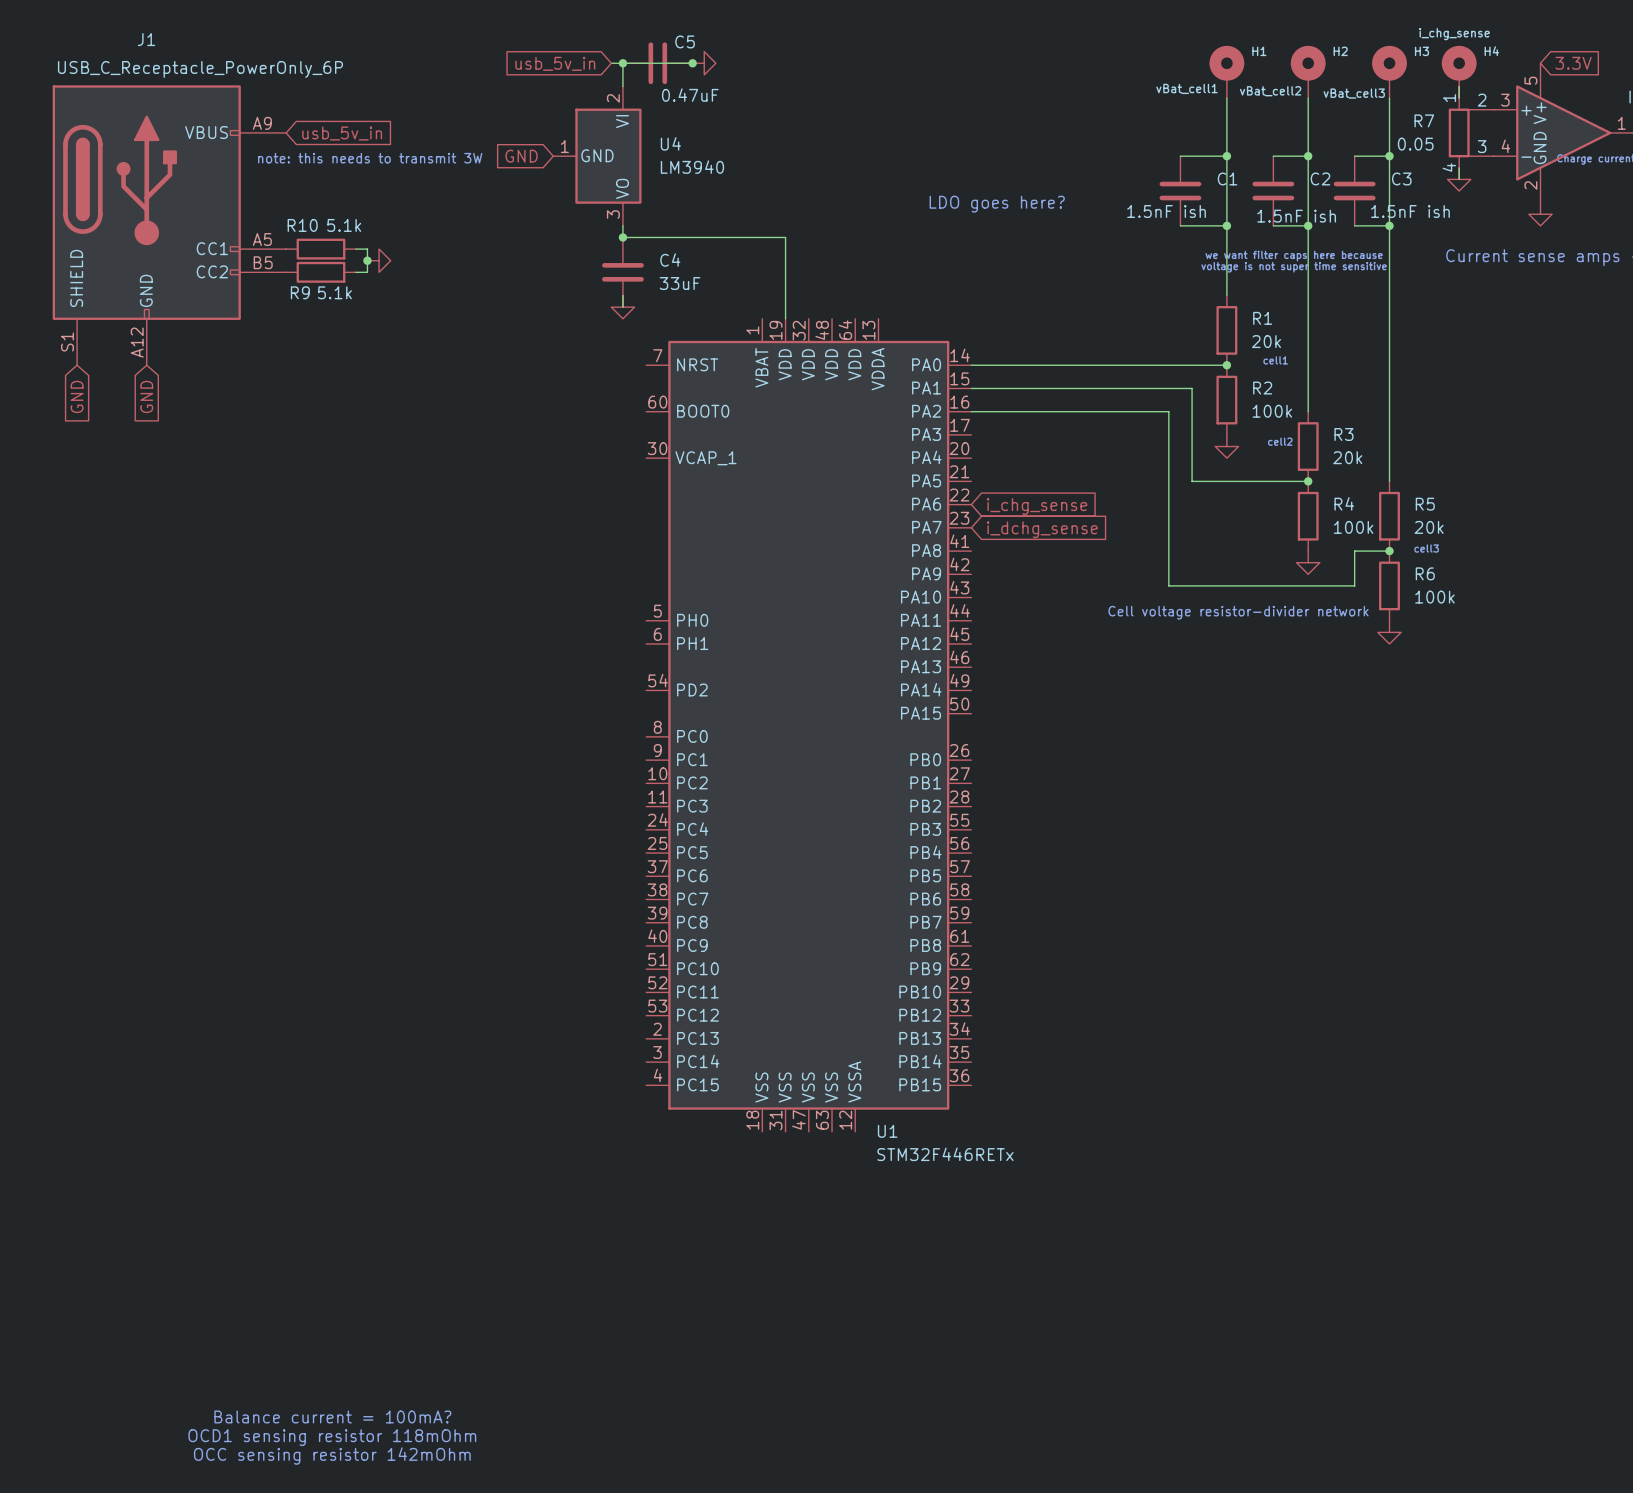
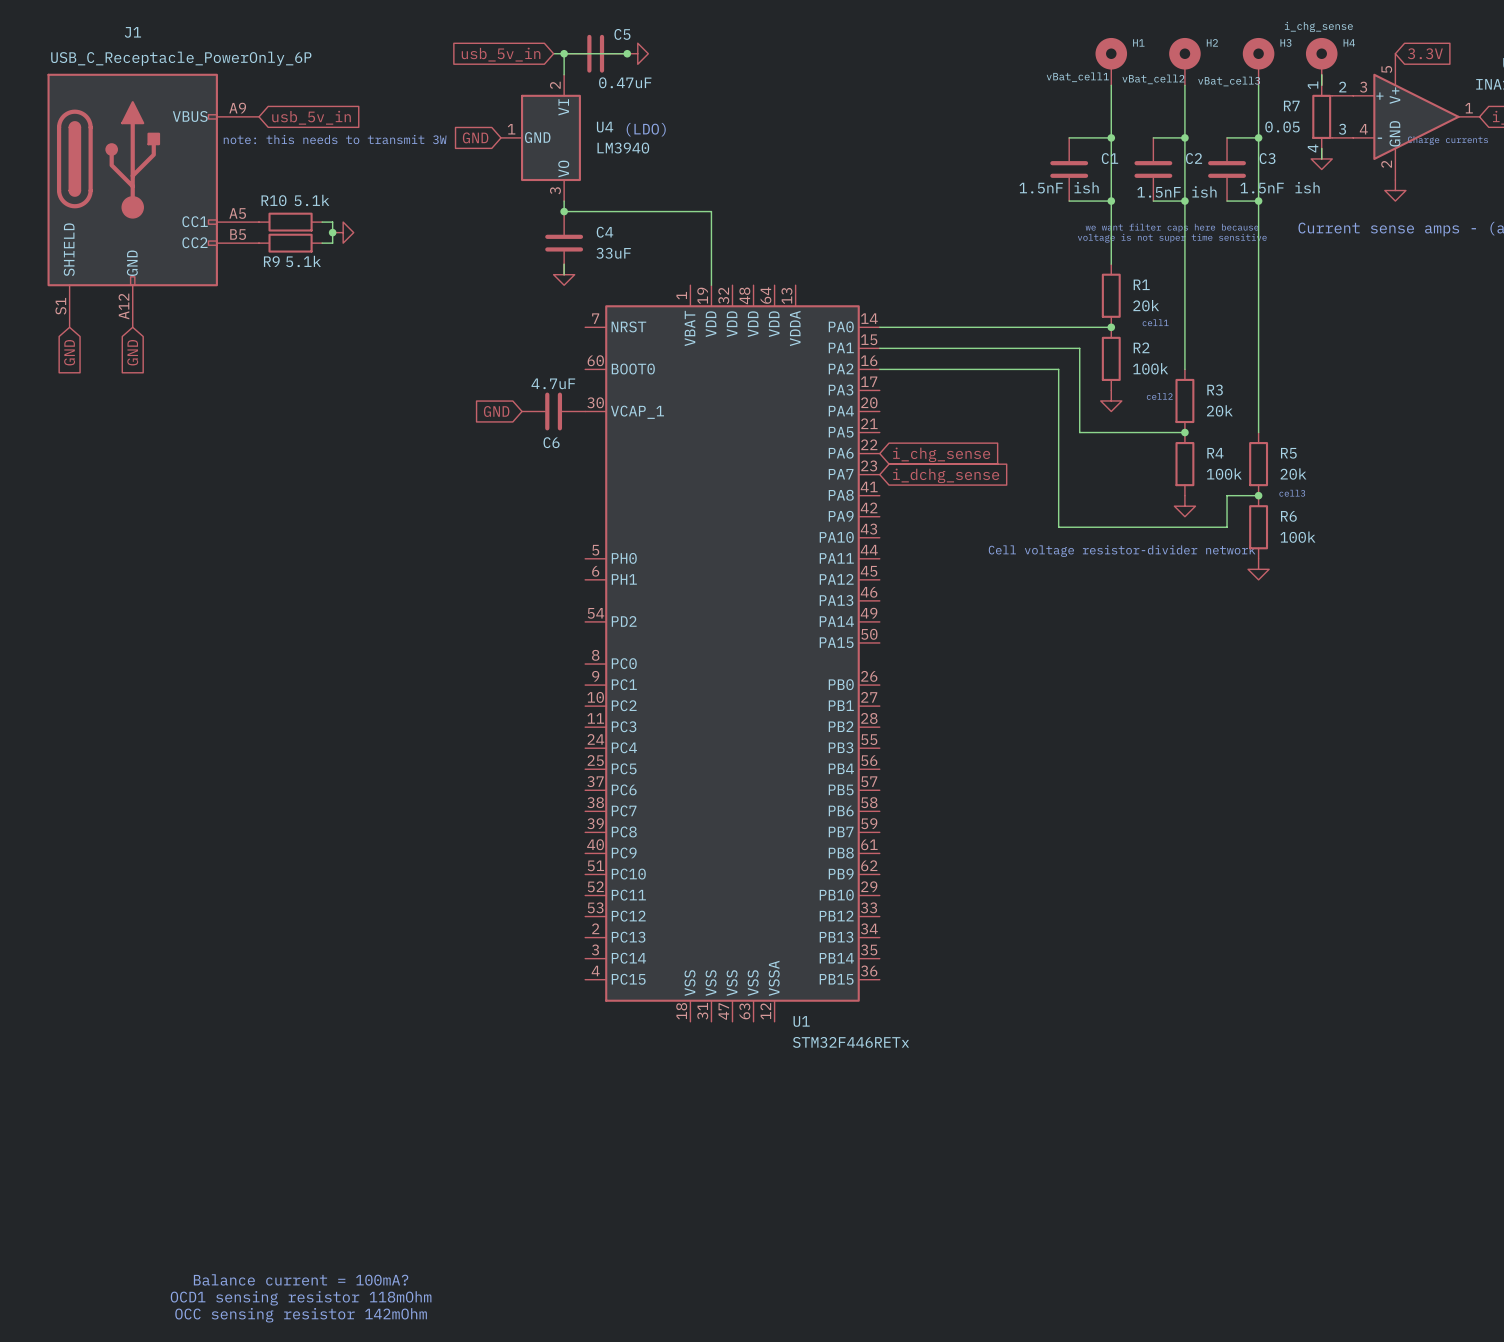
text: none -> (LDO) (646, 129)
text: LDO goes here? (997, 204) -> none
global label: none -> GND (496, 411)
C6: none -> 4.7uF (553, 411)

